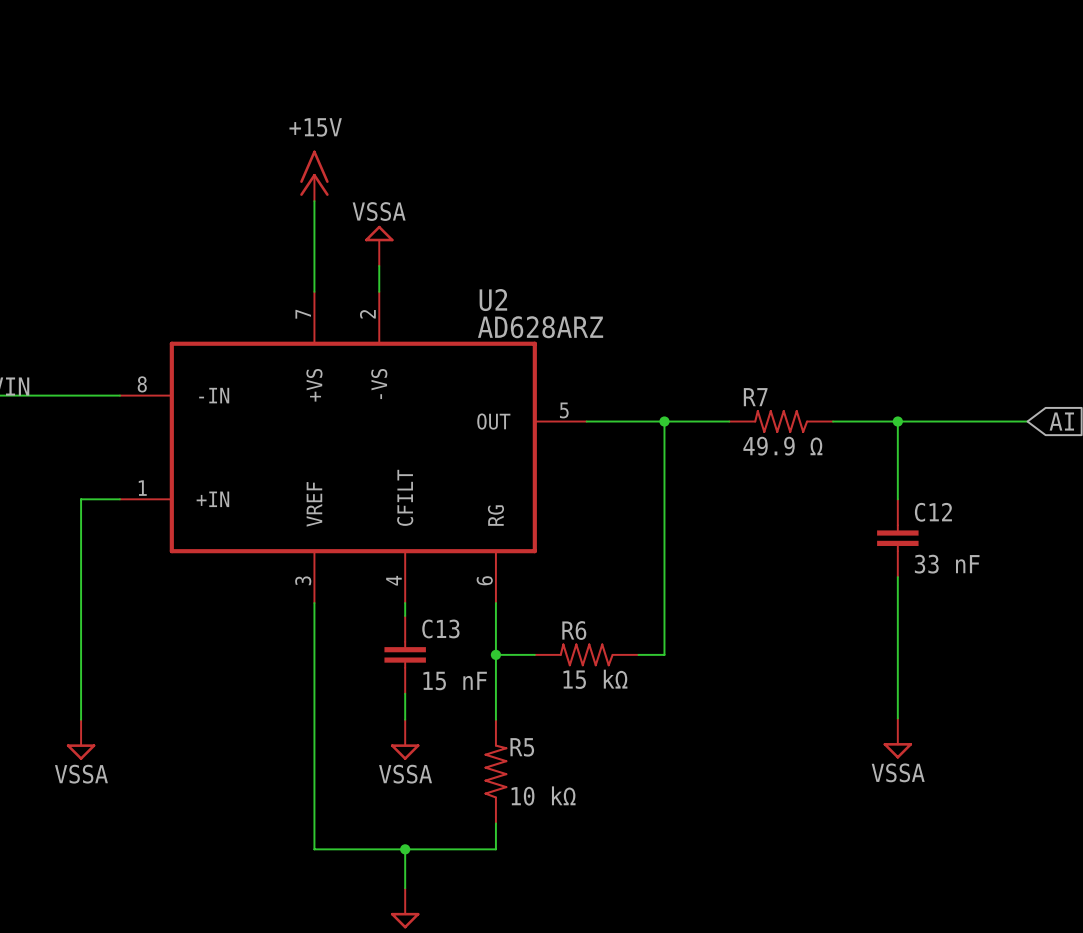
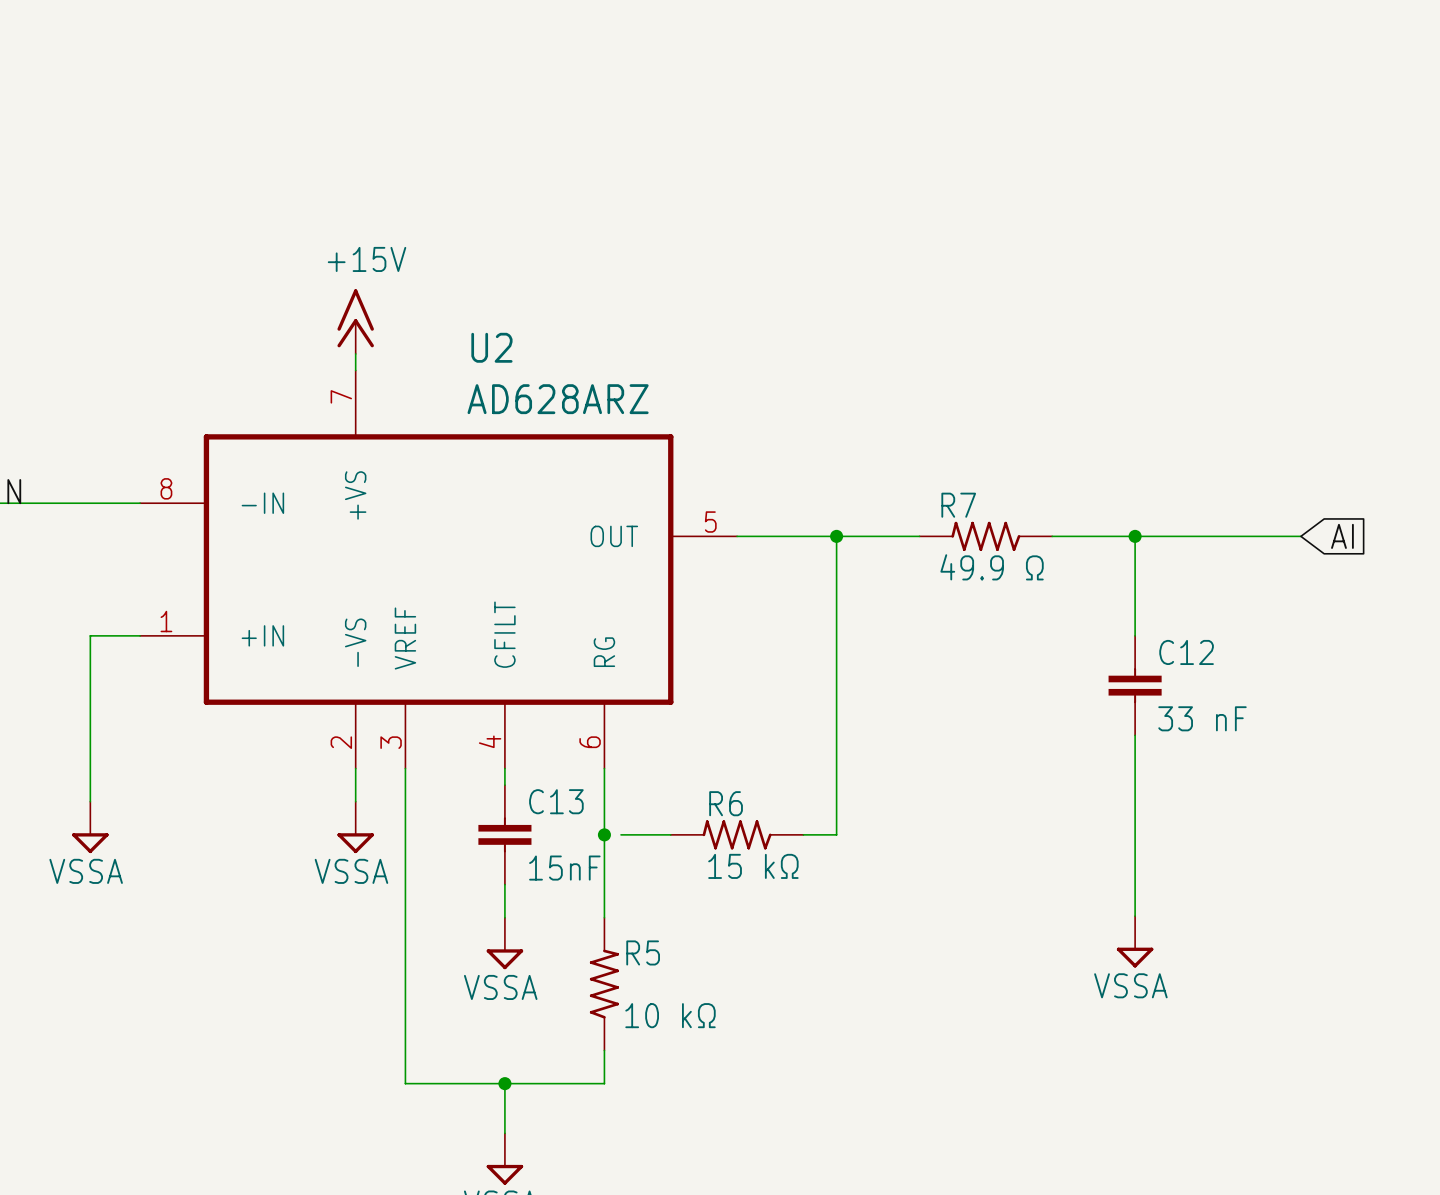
power symbol position: +15V (314, 175) -> +15V (355, 321)
wire: (314, 201) (314, 291) -> none
power symbol: VSSA (379, 245) -> none
wire: (379, 265) (379, 291) -> none
wire: none -> (355, 353) (355, 370)
U2 symbol: [119, 291, 587, 604] -> [140, 370, 738, 769]
U2 name position: U2 (493, 300) -> U2 (491, 347)
U2 value position: AD628ARZ (540, 327) -> AD628ARZ (558, 399)
wire: none -> (355, 768) (355, 801)
wire: (314, 603) (314, 849) (327, 849) -> (405, 768) (405, 1083)
wire: (495, 603) (495, 719) -> (604, 768) (604, 917)
wire: (81, 628) (81, 719) -> none
power symbol: none -> VSSA (355, 827)
junction position: (495, 654) -> (604, 834)
C13 value: 15 nF (455, 680) -> 15nF (564, 868)
power symbol position: VSSA (81, 739) -> VSSA (90, 827)
R5 position: (495, 771) -> (604, 984)
wire: (495, 823) (495, 849) (482, 849) -> (604, 1050) (604, 1083)

